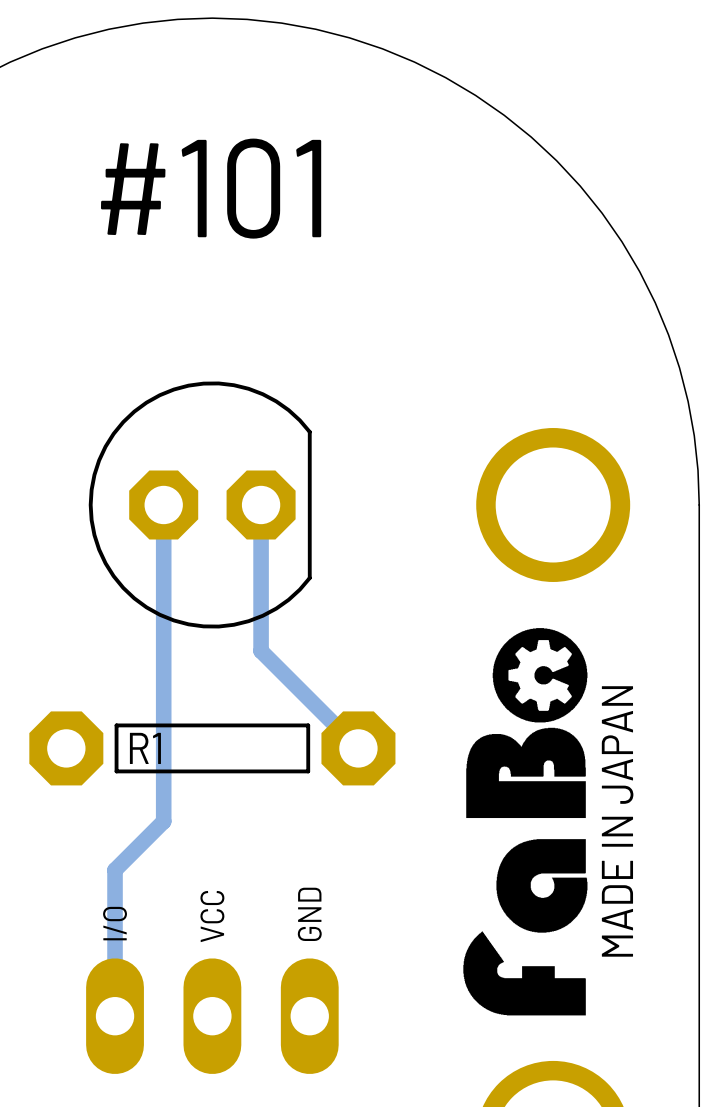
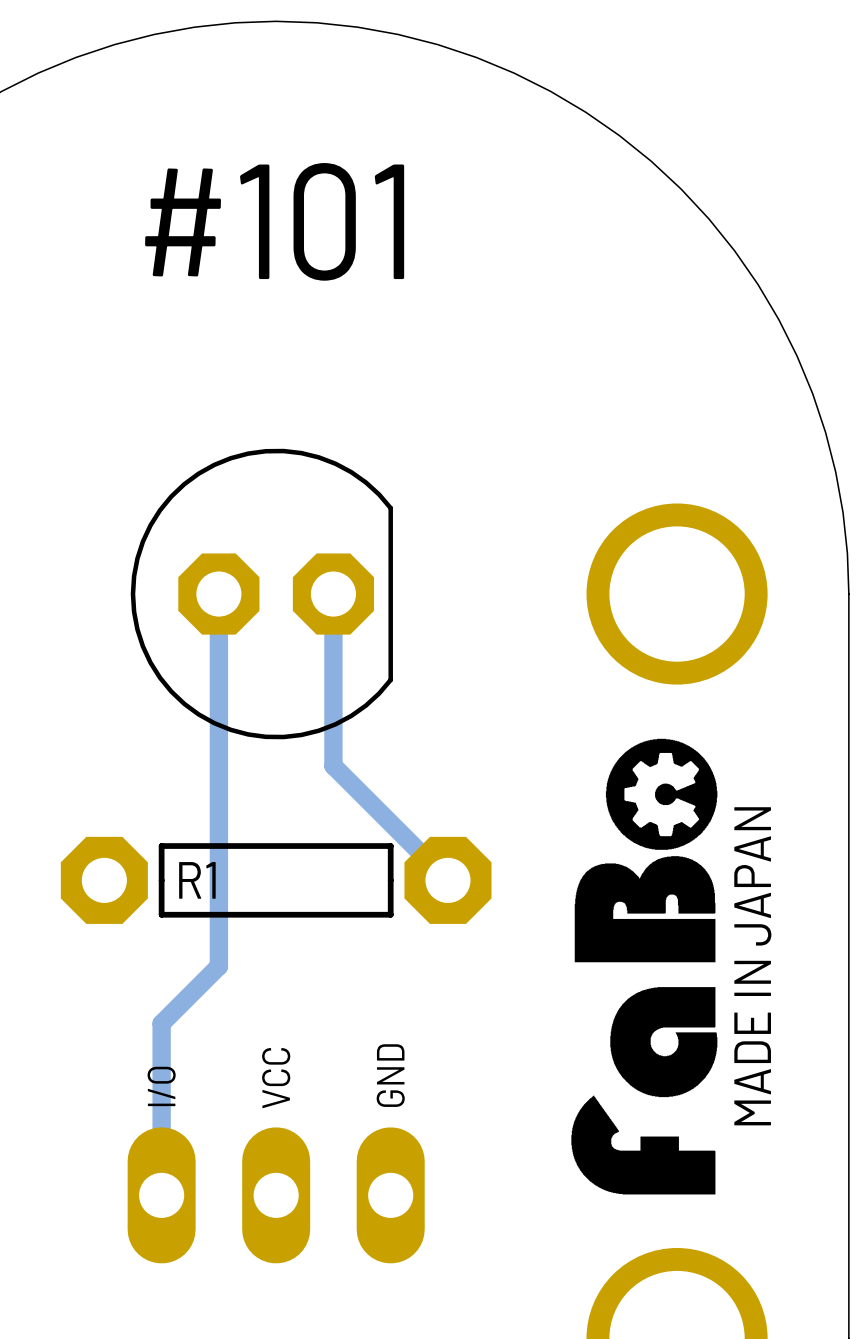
R1 footprint: [29, 711, 396, 786] -> [60, 836, 492, 924]

